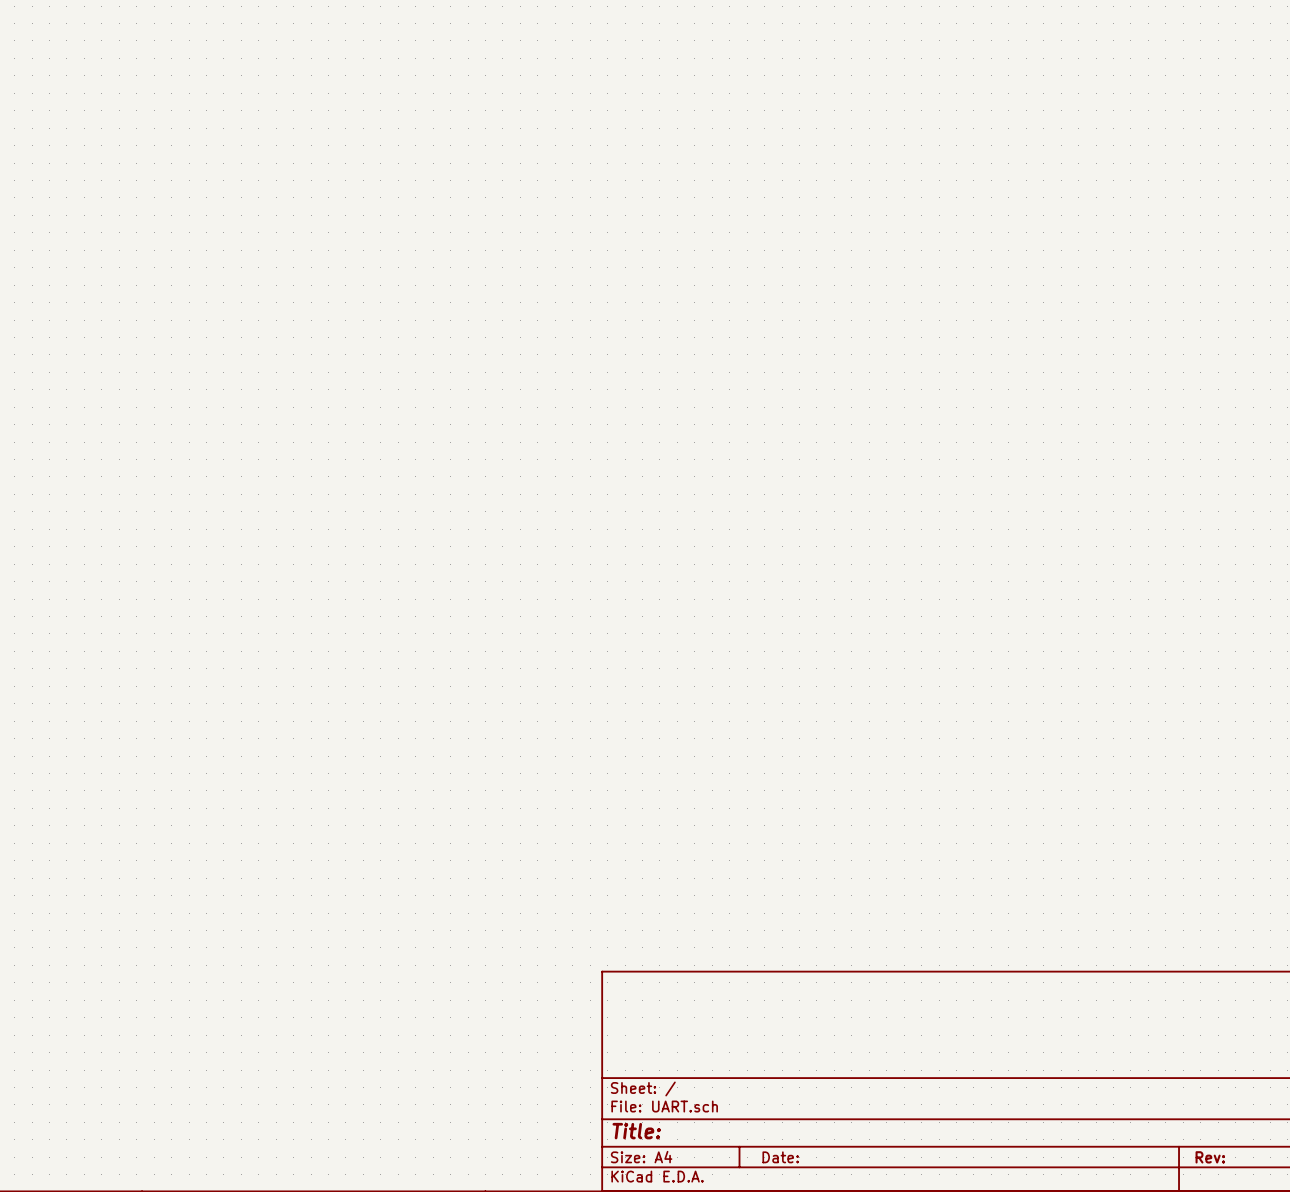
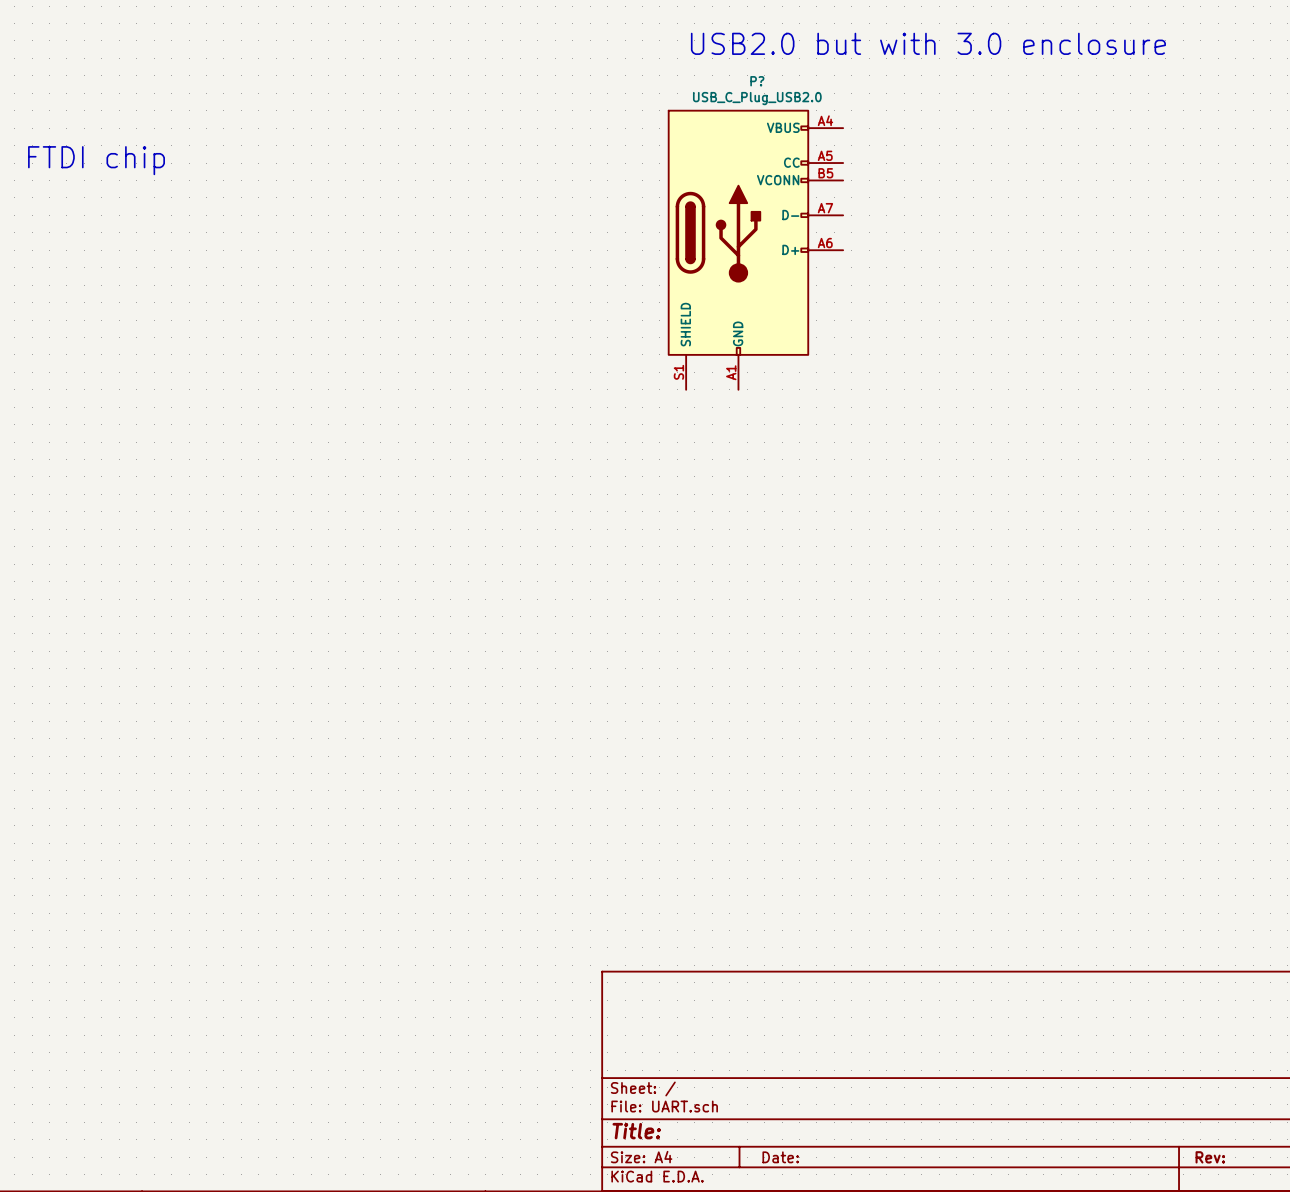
text: none -> USB2.0 but with 3.0 enclosure (928, 43)
text: none -> FTDI chip (96, 160)
P?: none -> USB_C_Plug_USB2.0 (755, 249)

